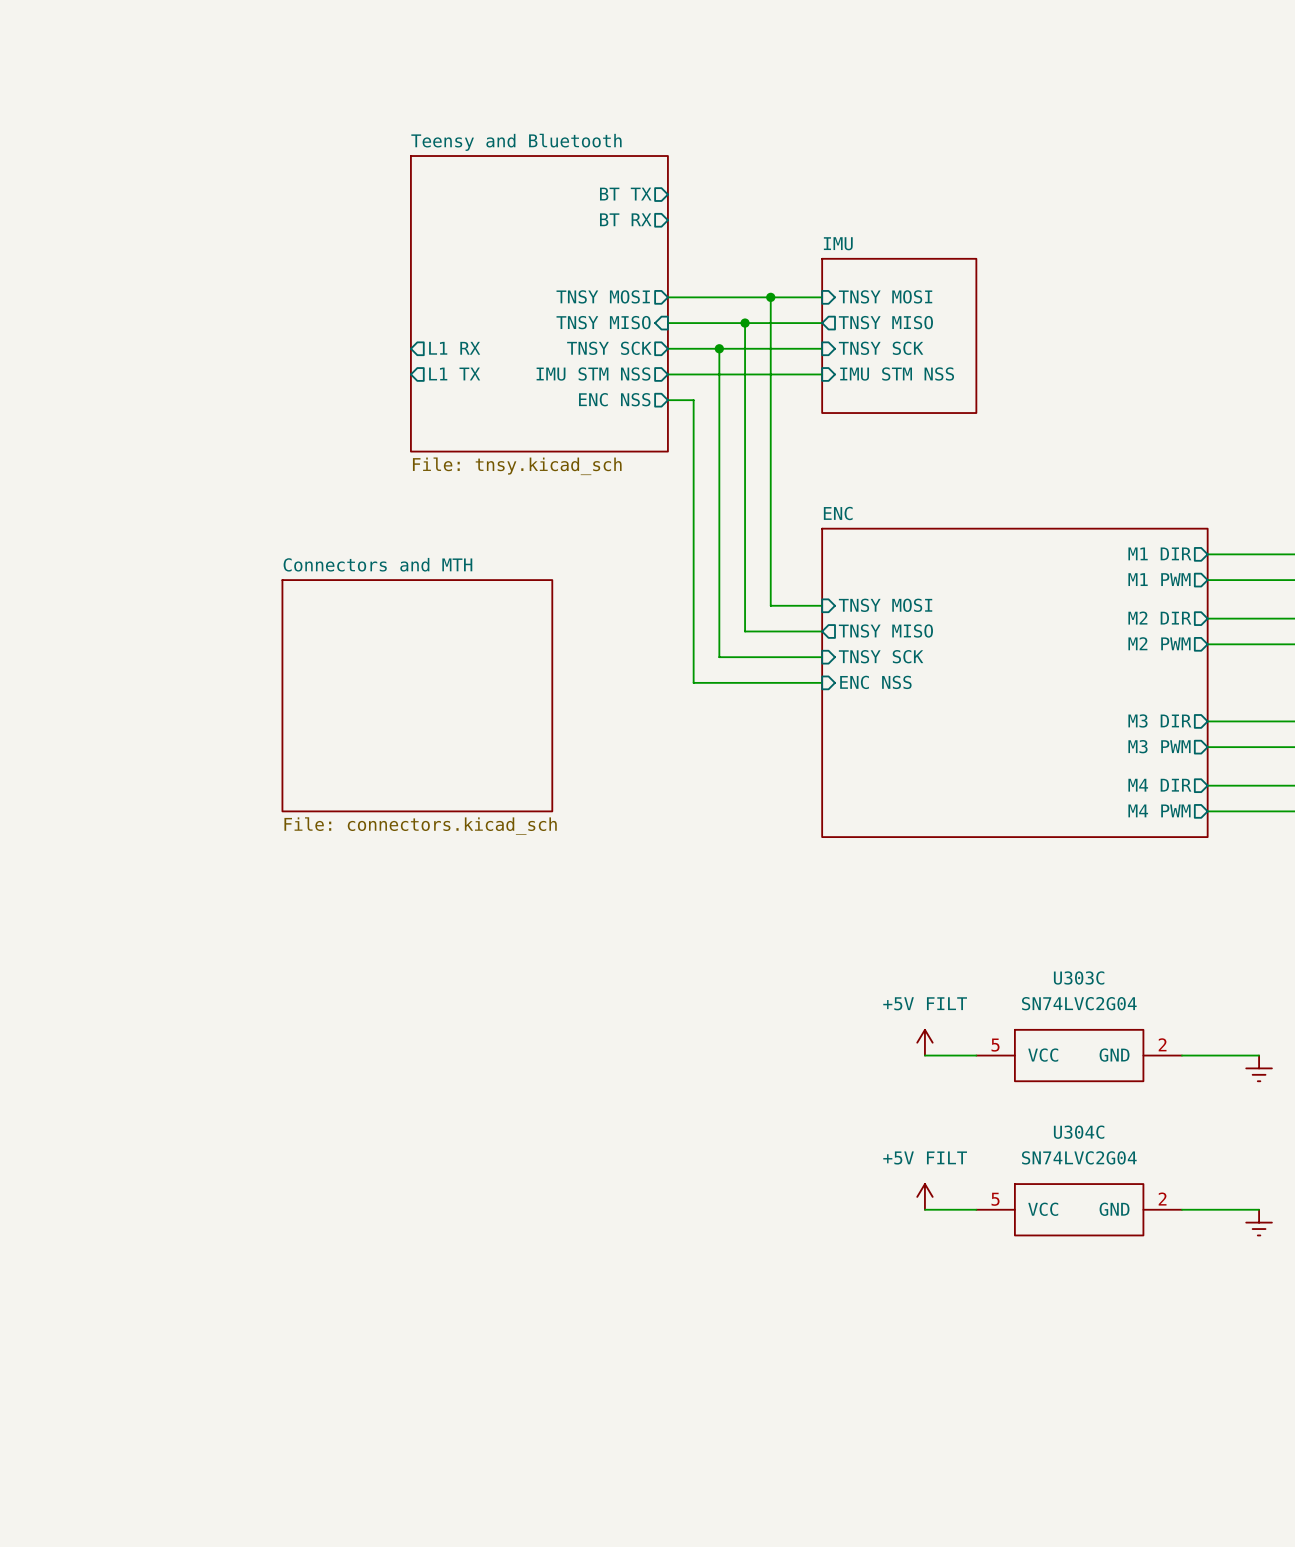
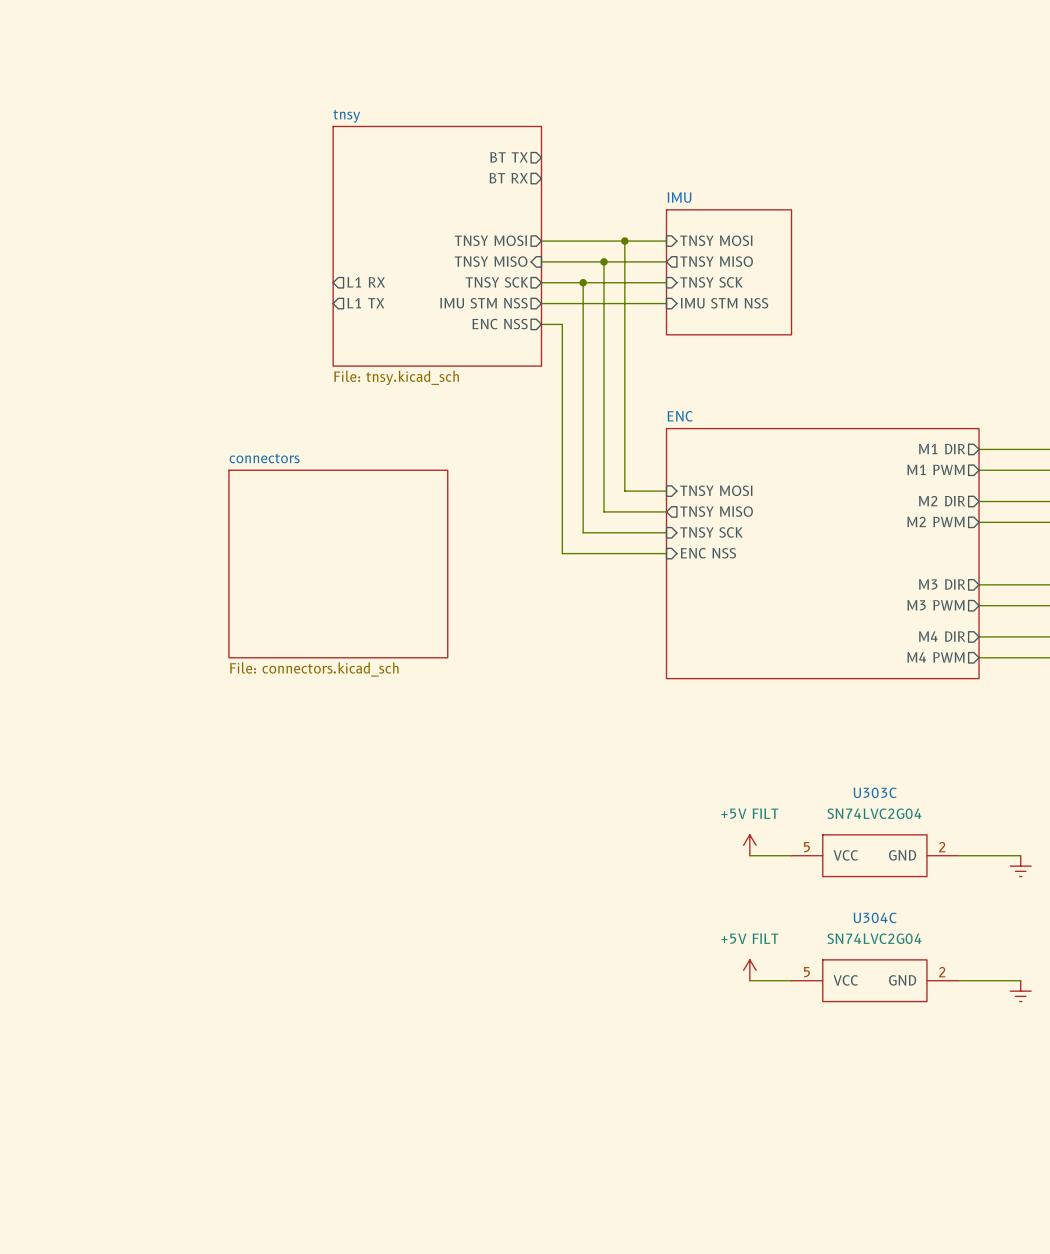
sheet Teensy and Bluetooth name: Teensy and Bluetooth (516, 142) -> tnsy (346, 116)
sheet Connectors and MTH name: Connectors and MTH (377, 564) -> connectors (264, 458)

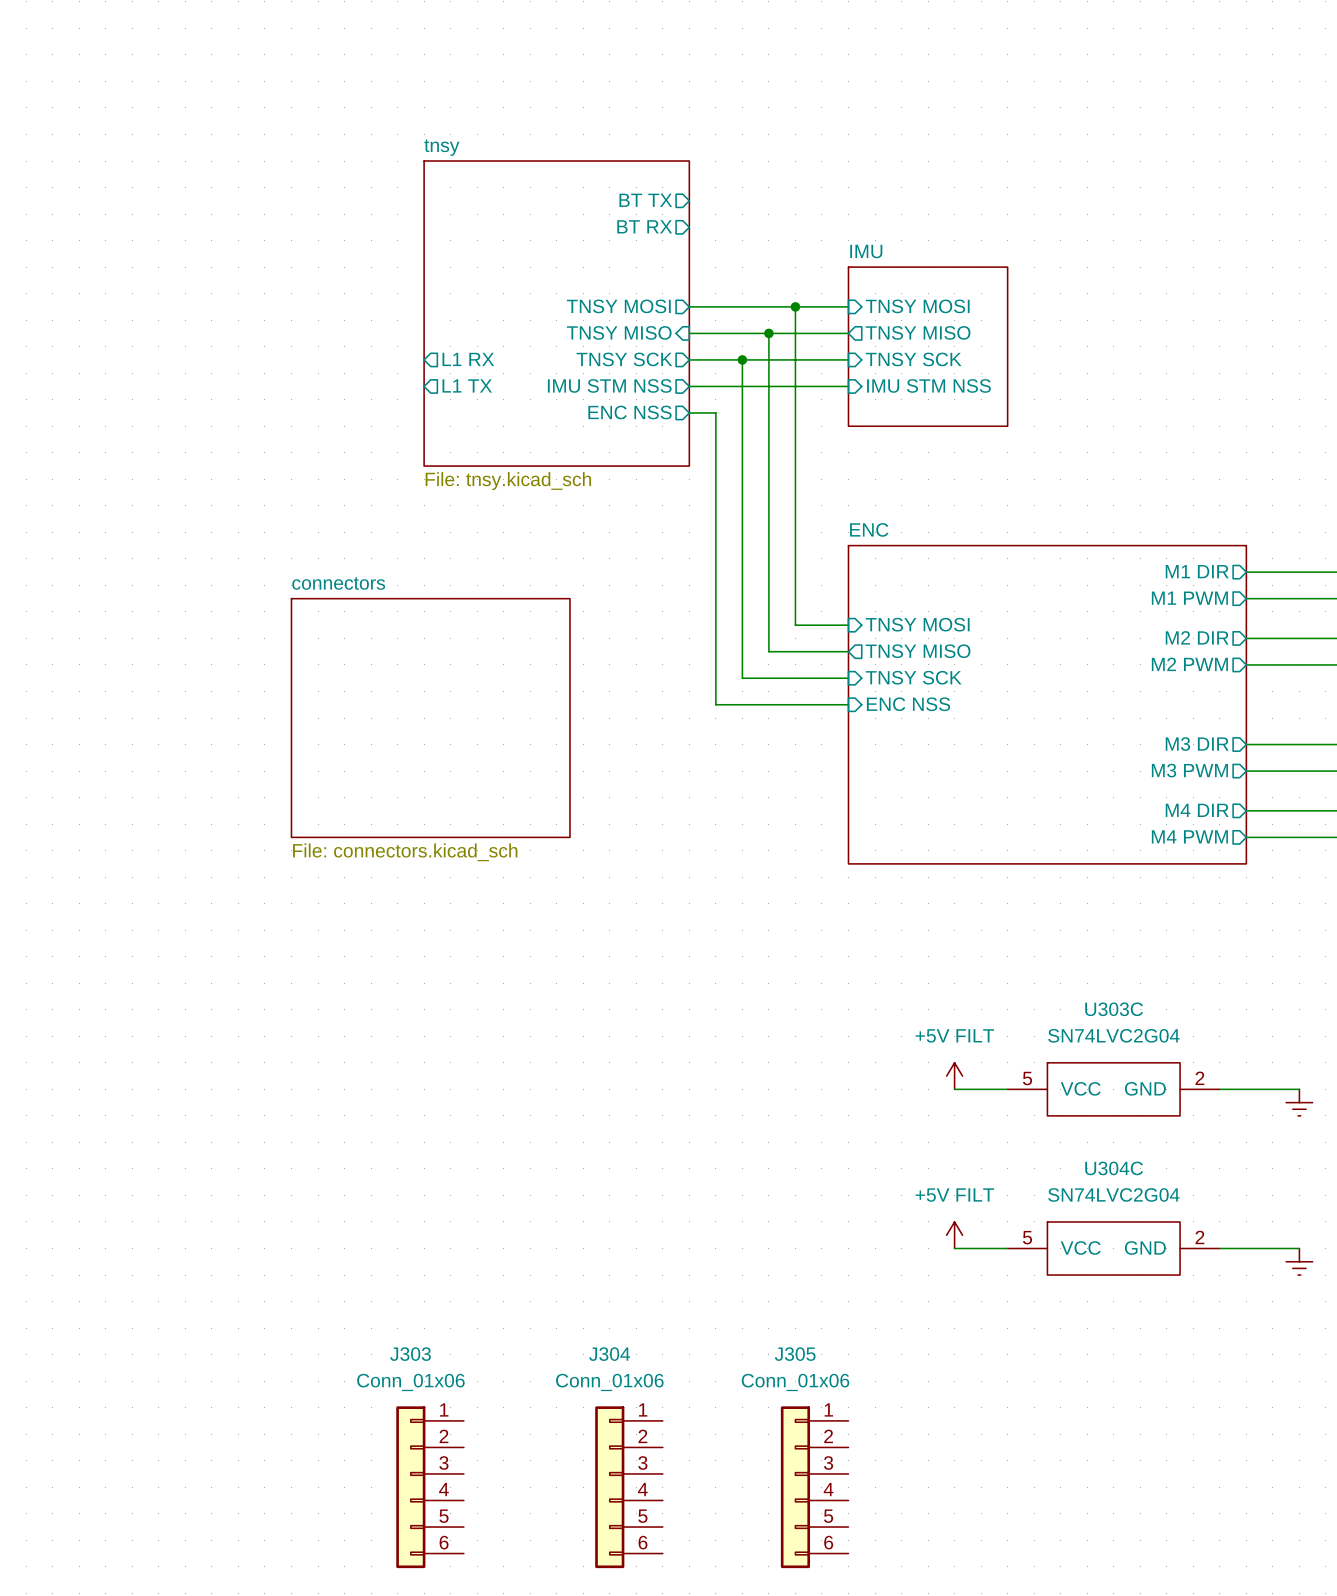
J303: none -> Conn_01x06 (430, 1487)
J304: none -> Conn_01x06 (629, 1487)
J305: none -> Conn_01x06 (814, 1487)

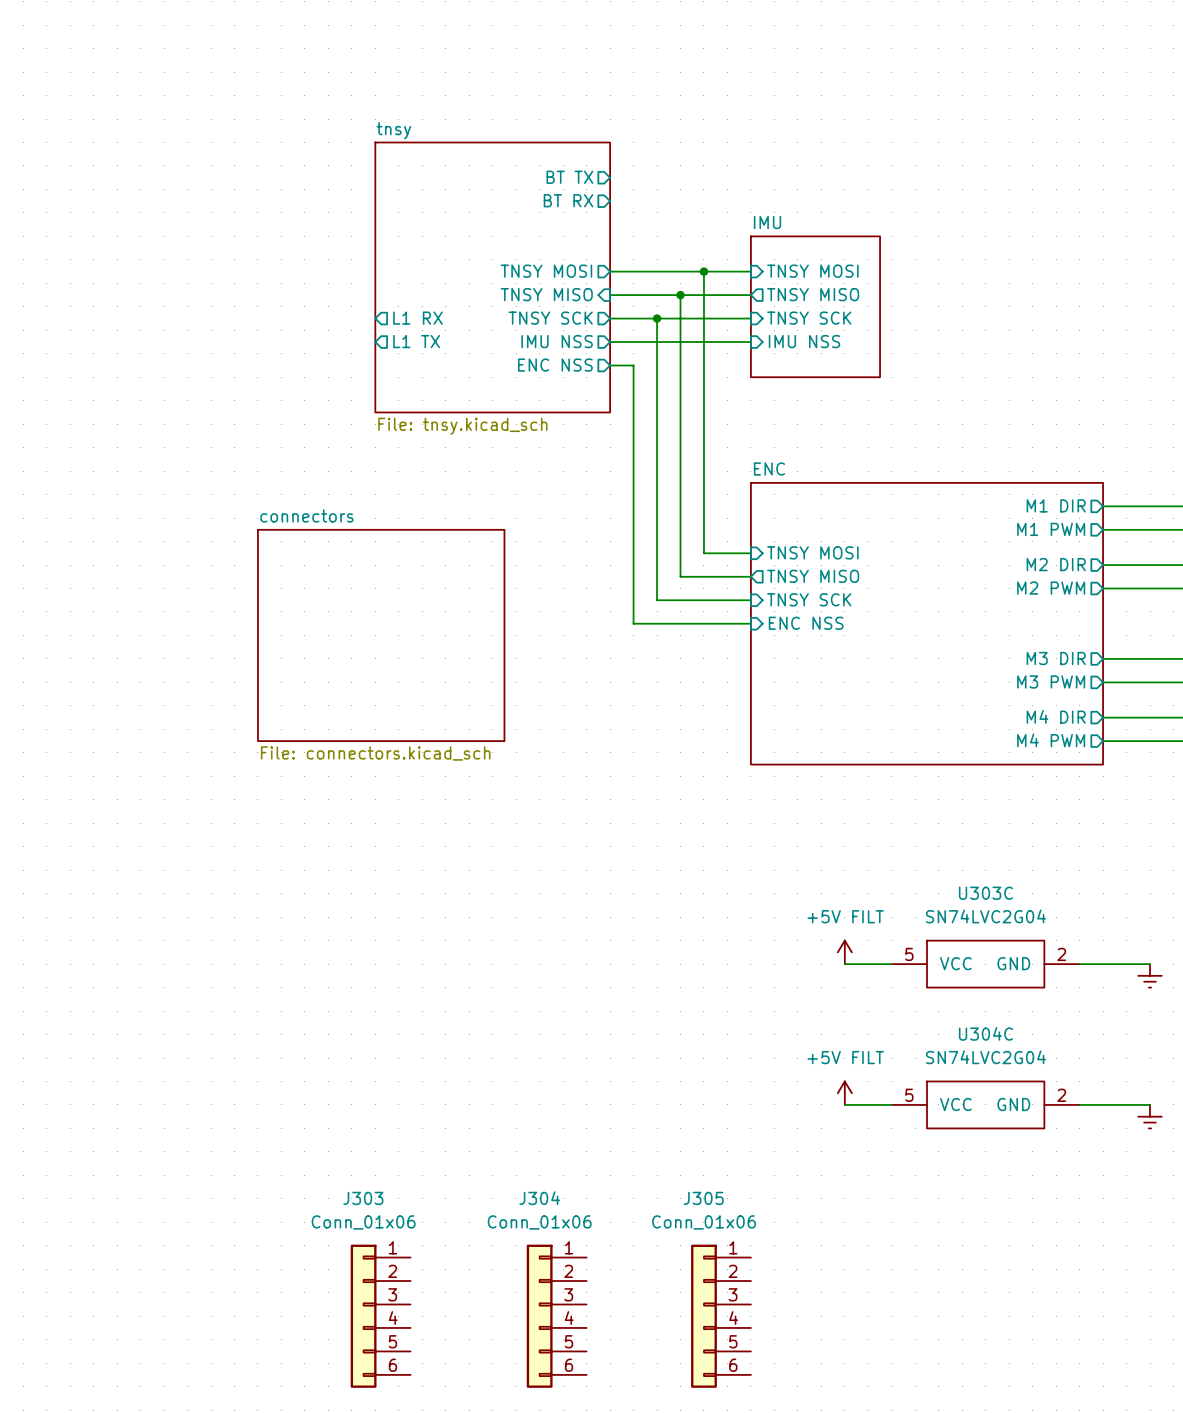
sheet IMU shape: [847, 266, 1009, 428] -> [750, 235, 881, 378]
sheet pin: IMU STM NSS (609, 385) -> IMU NSS (557, 341)
sheet pin: IMU STM NSS (928, 385) -> IMU NSS (804, 341)

